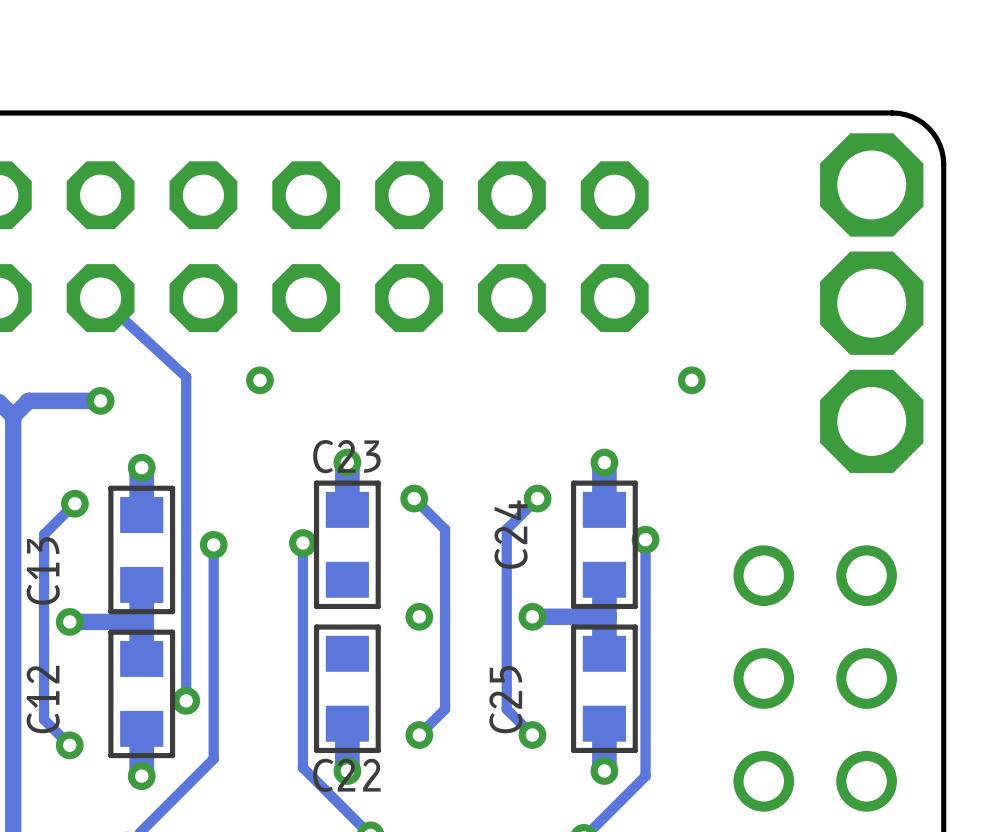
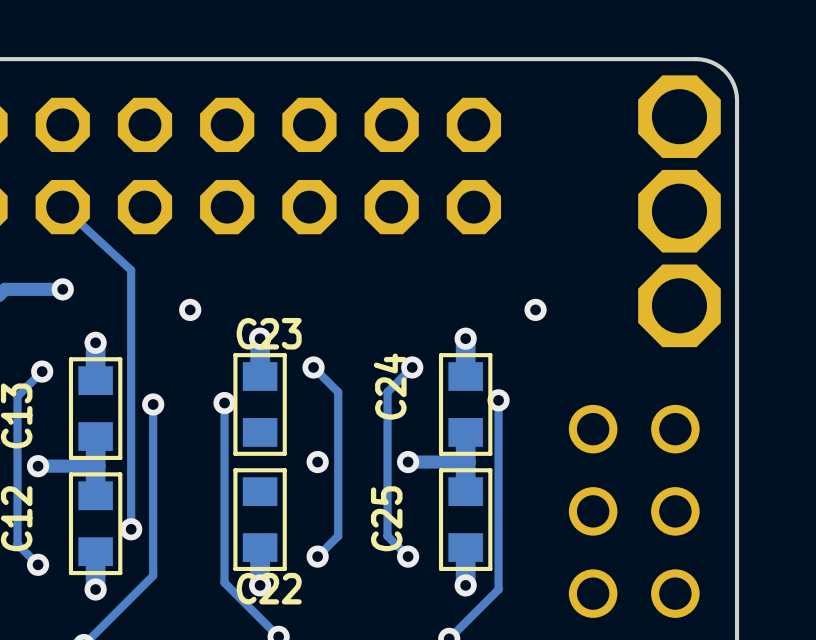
via position: (259, 380) -> (190, 309)
via position: (691, 380) -> (535, 309)

